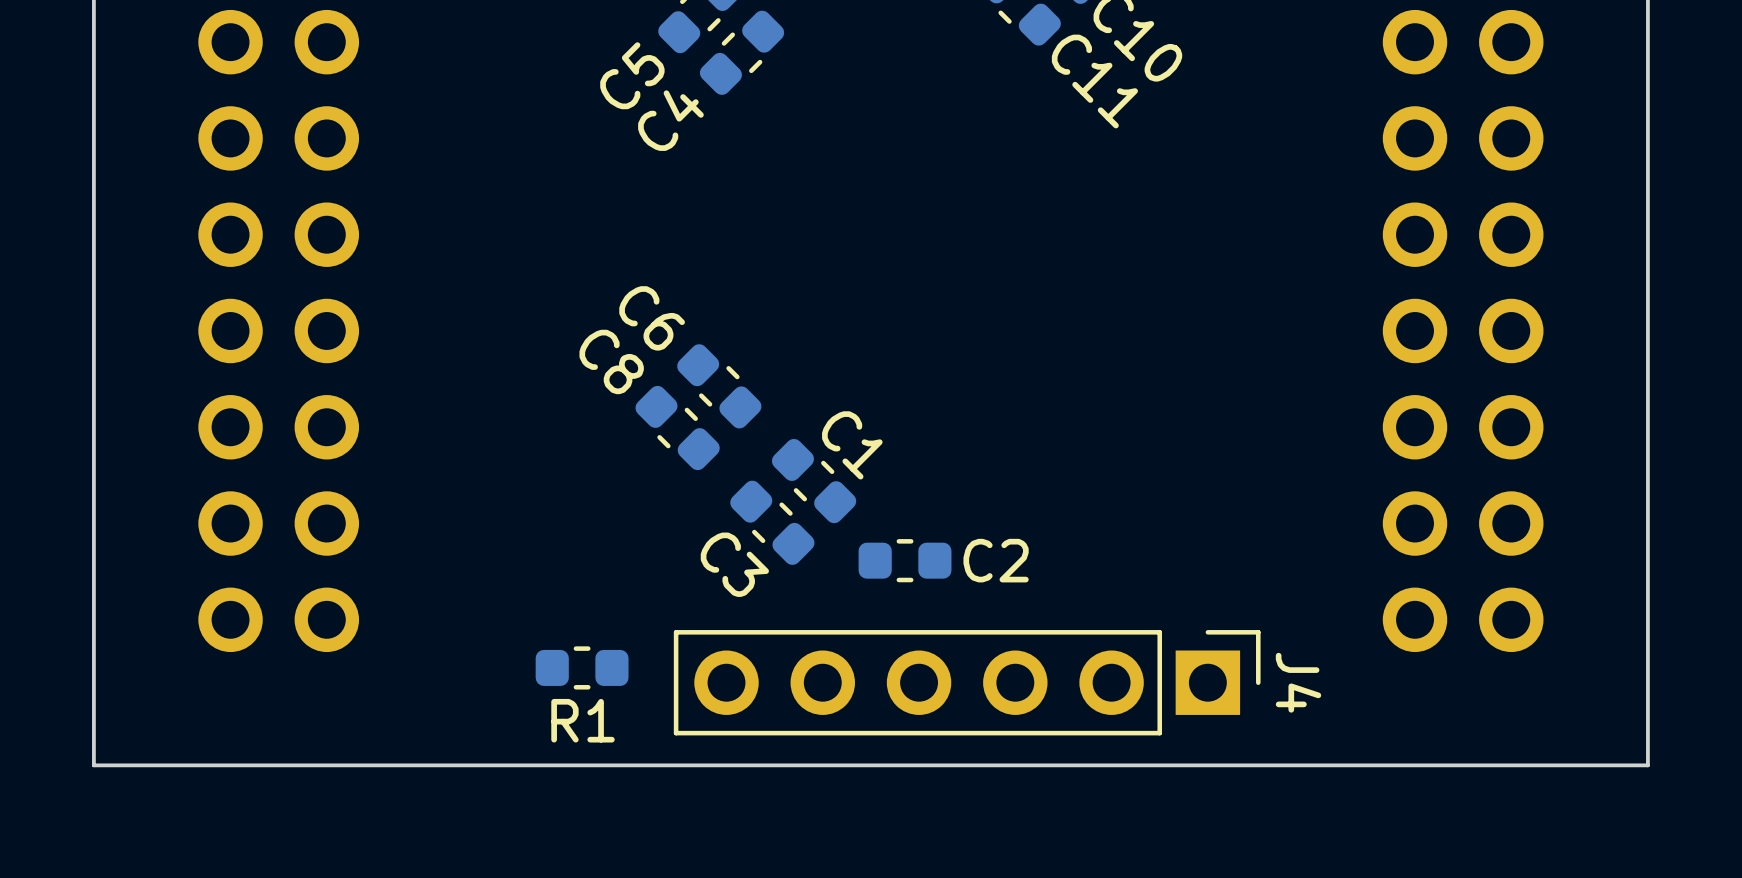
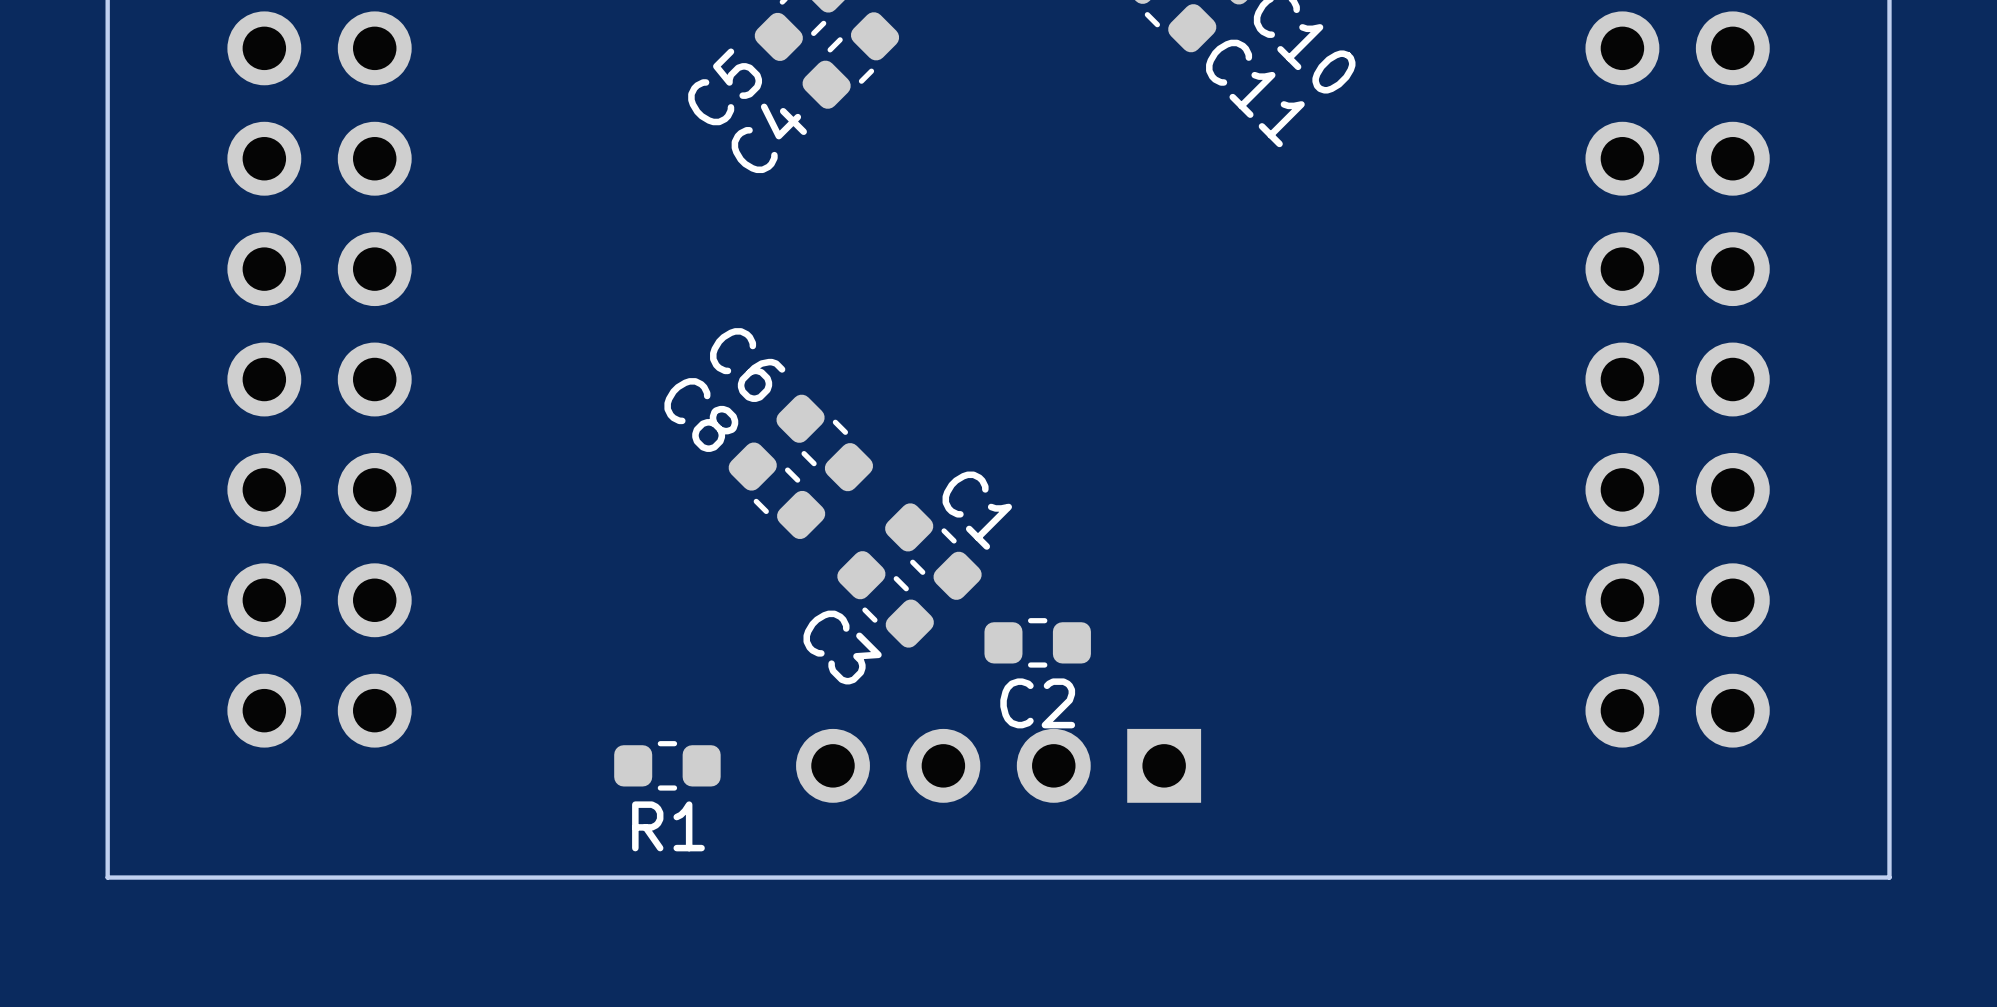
C2 name position: C2 (996, 560) -> C2 (1037, 703)
part: none -> (998, 765)
J4: (967, 682) -> none

